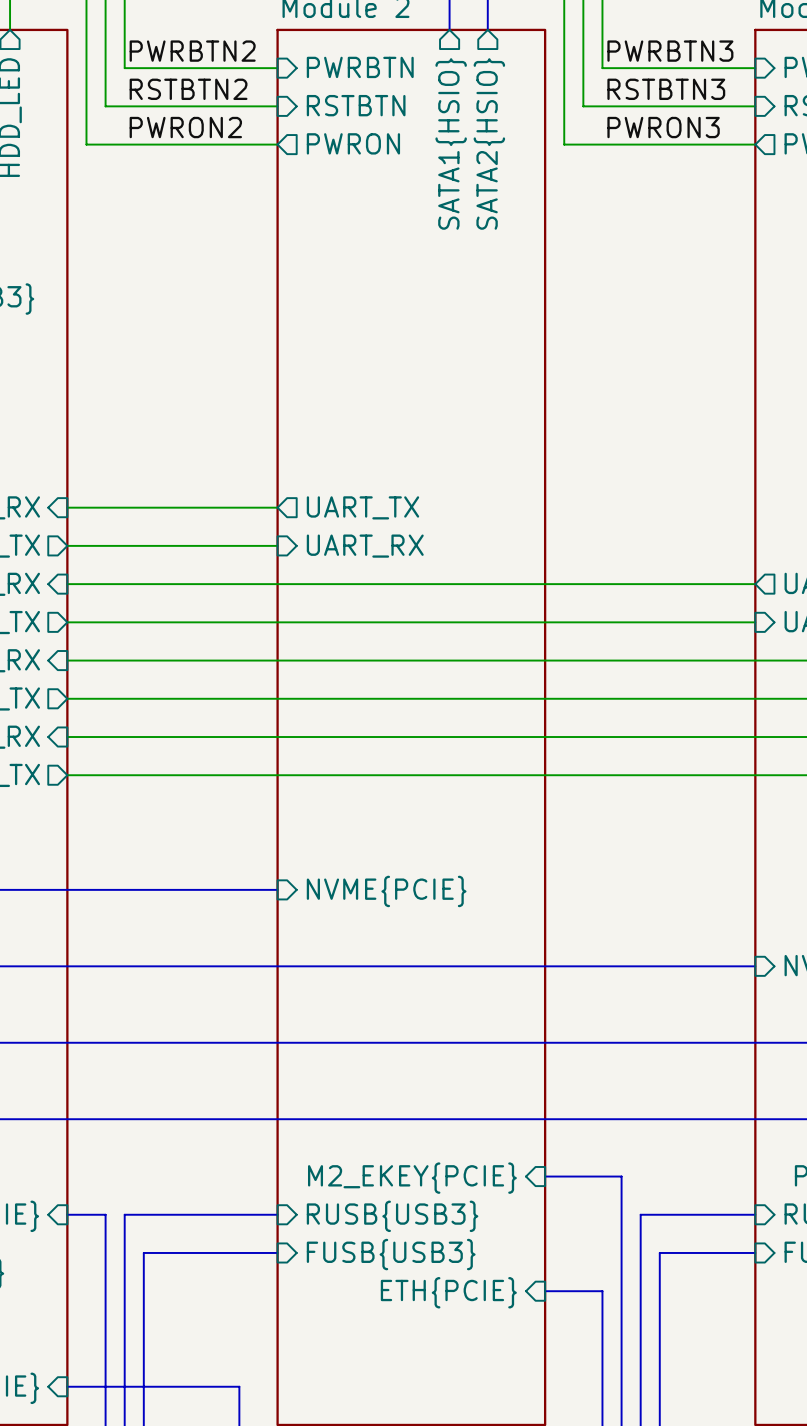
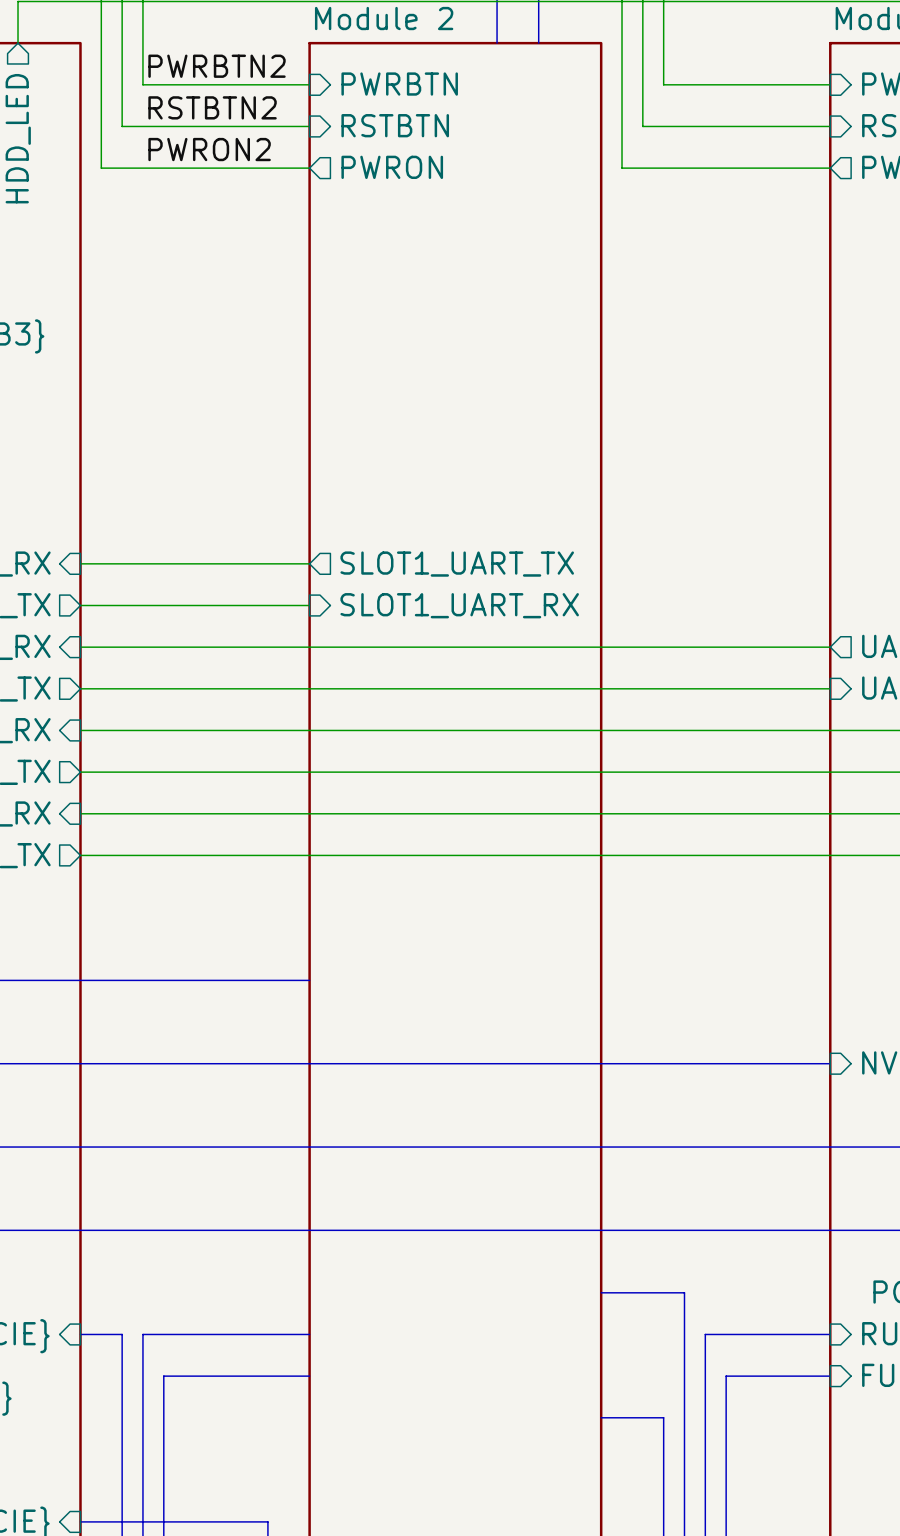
label: PWRBTN3 (670, 51) -> none
label: RSTBTN3 (666, 89) -> none
label: PWRON3 (663, 127) -> none
sheet pin: SATA1{HSIO} (451, 143) -> none
sheet pin: SATA2{HSIO} (489, 143) -> none
sheet pin: UART_TX (362, 507) -> SLOT1_UART_TX (457, 564)
sheet pin: UART_RX (365, 546) -> SLOT1_UART_RX (459, 605)
sheet pin: NVME{PCIE} (386, 891) -> none
sheet pin: M2_EKEY{PCIE} (412, 1178) -> none
sheet pin: RUSB{USB3} (392, 1216) -> none
sheet pin: FUSB{USB3} (391, 1254) -> none
sheet pin: ETH{PCIE} (448, 1292) -> none

